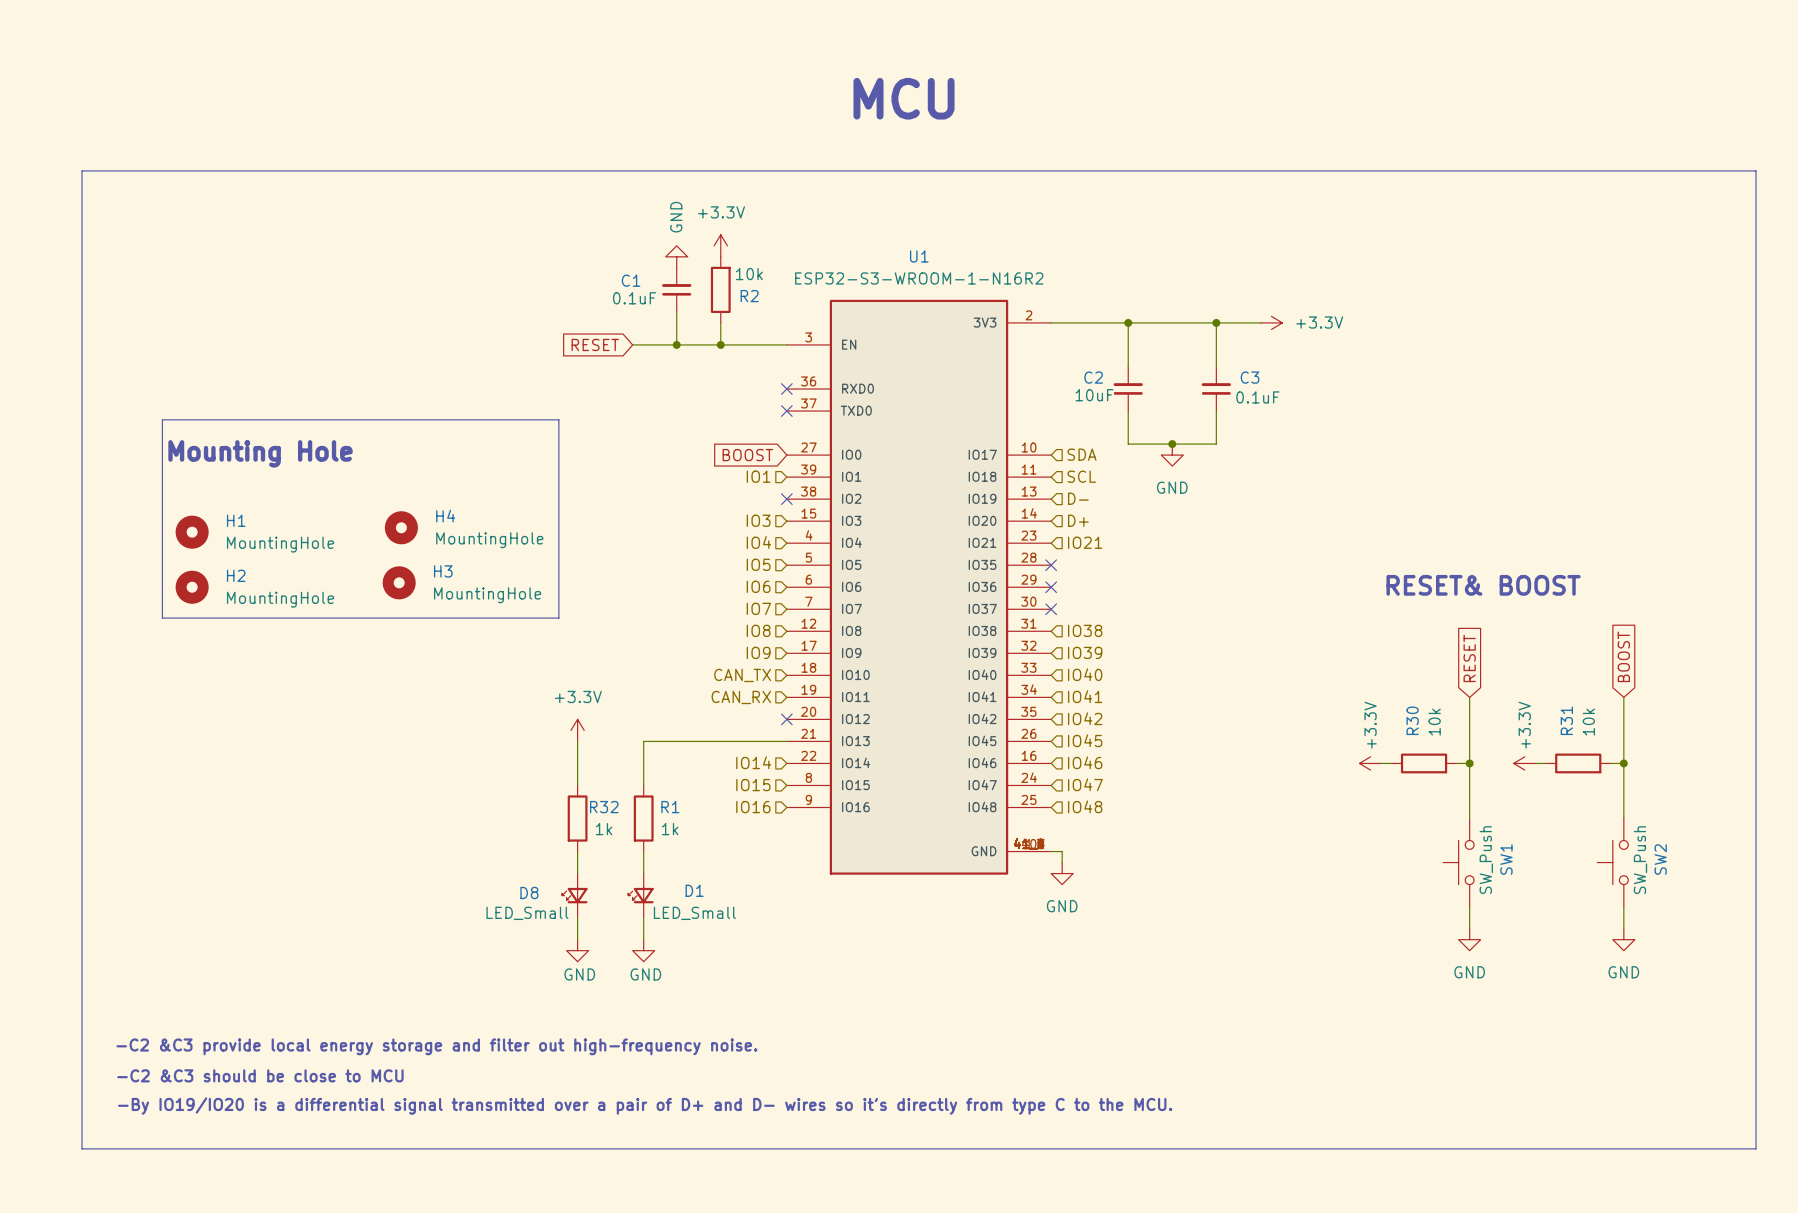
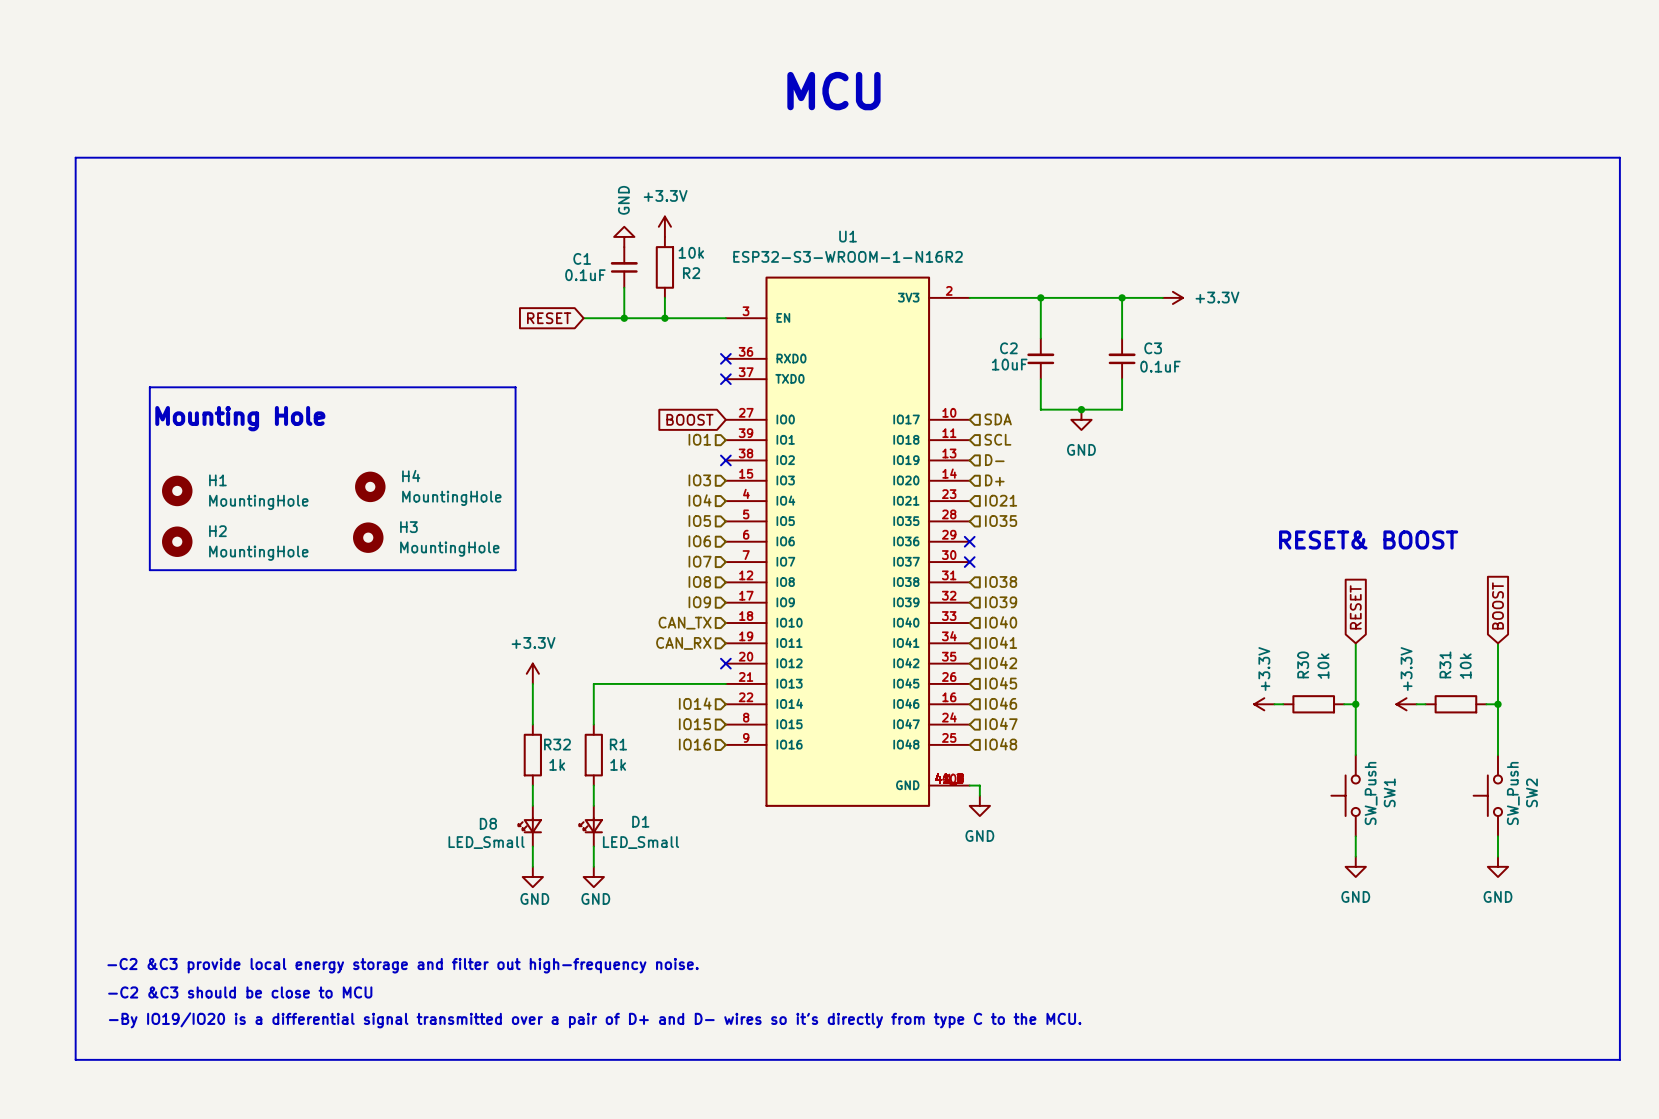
hierarchical label: none -> IO35 (1001, 521)
no-connect mark: (1051, 565) -> none

